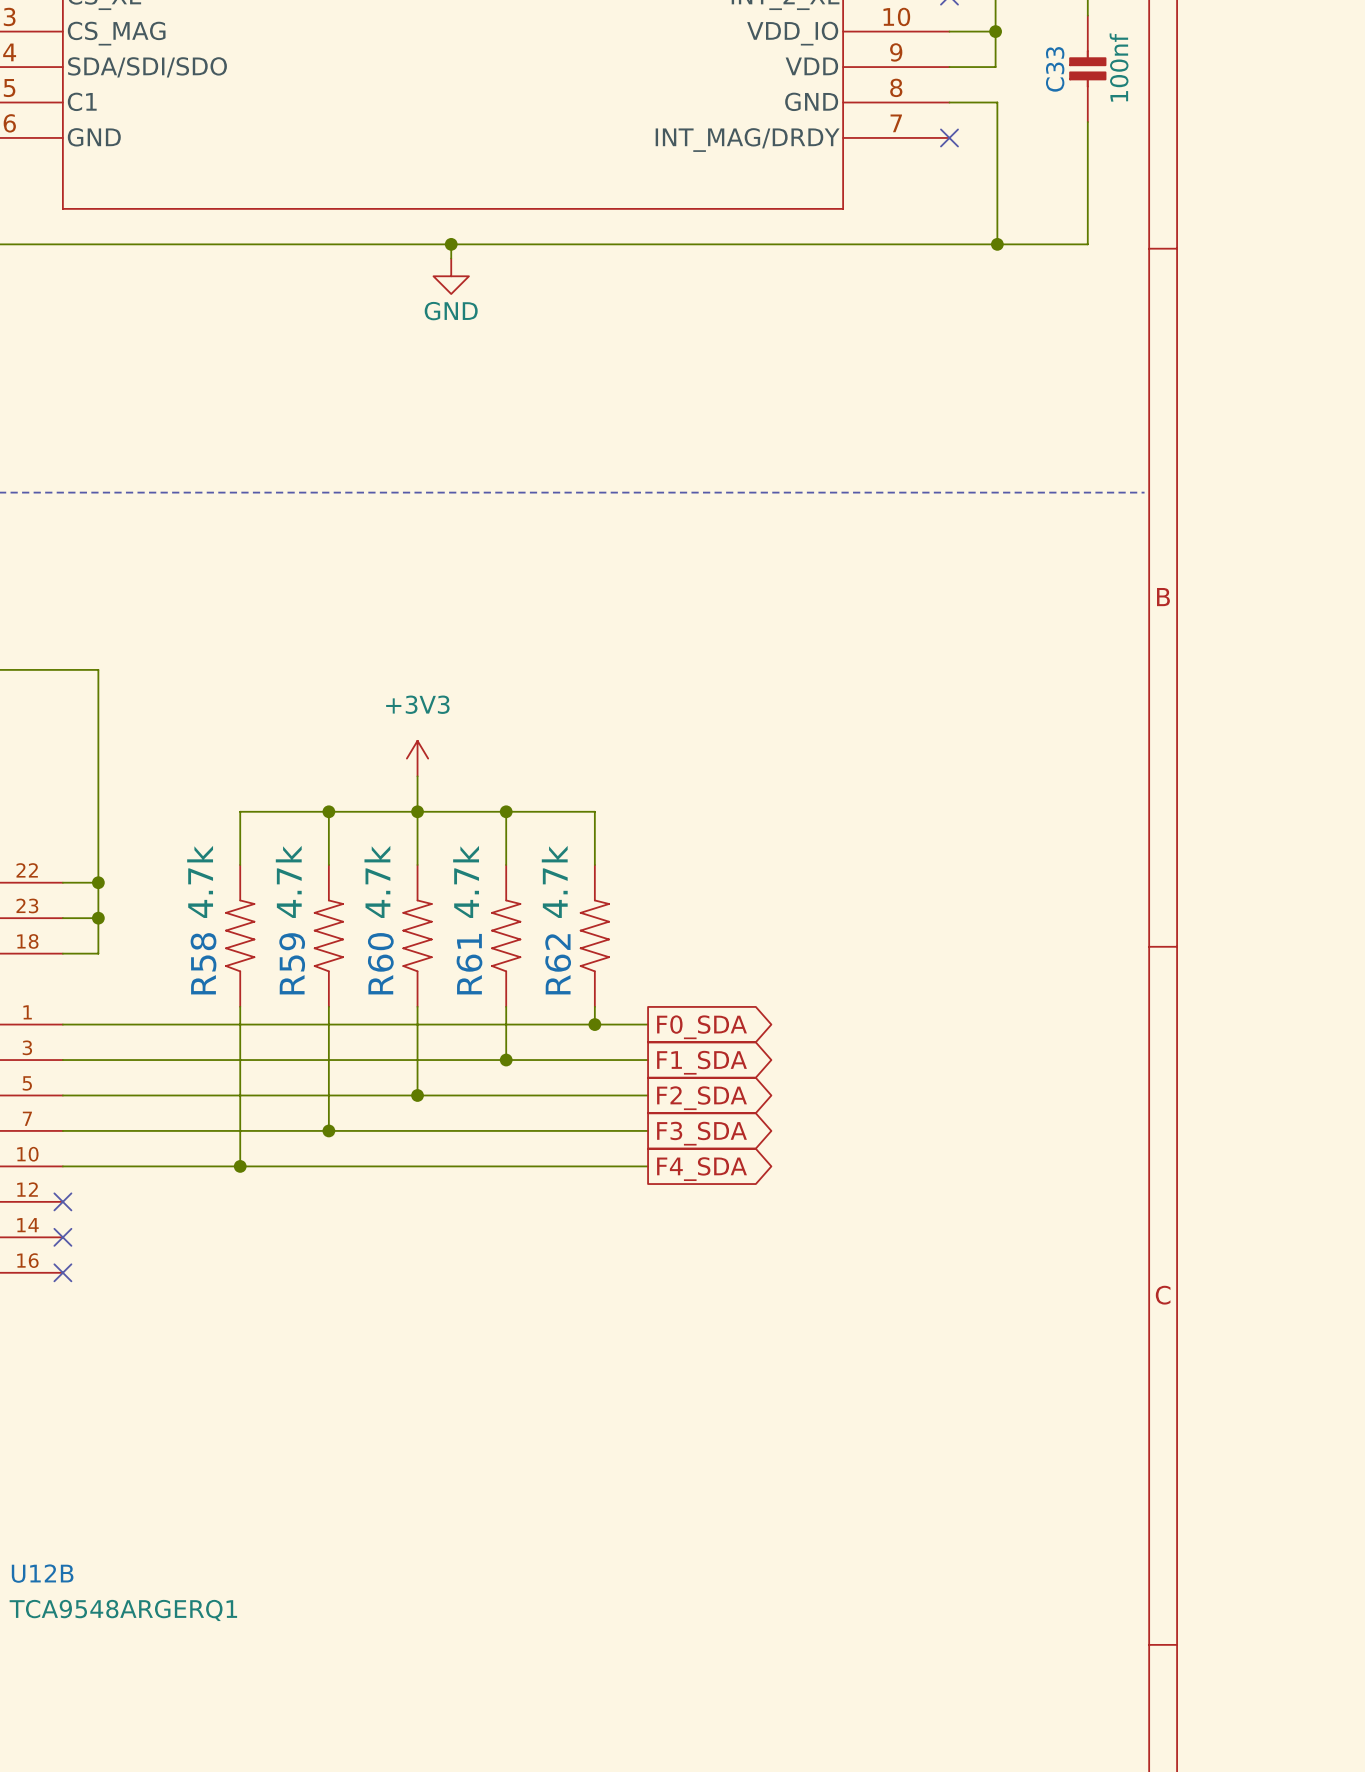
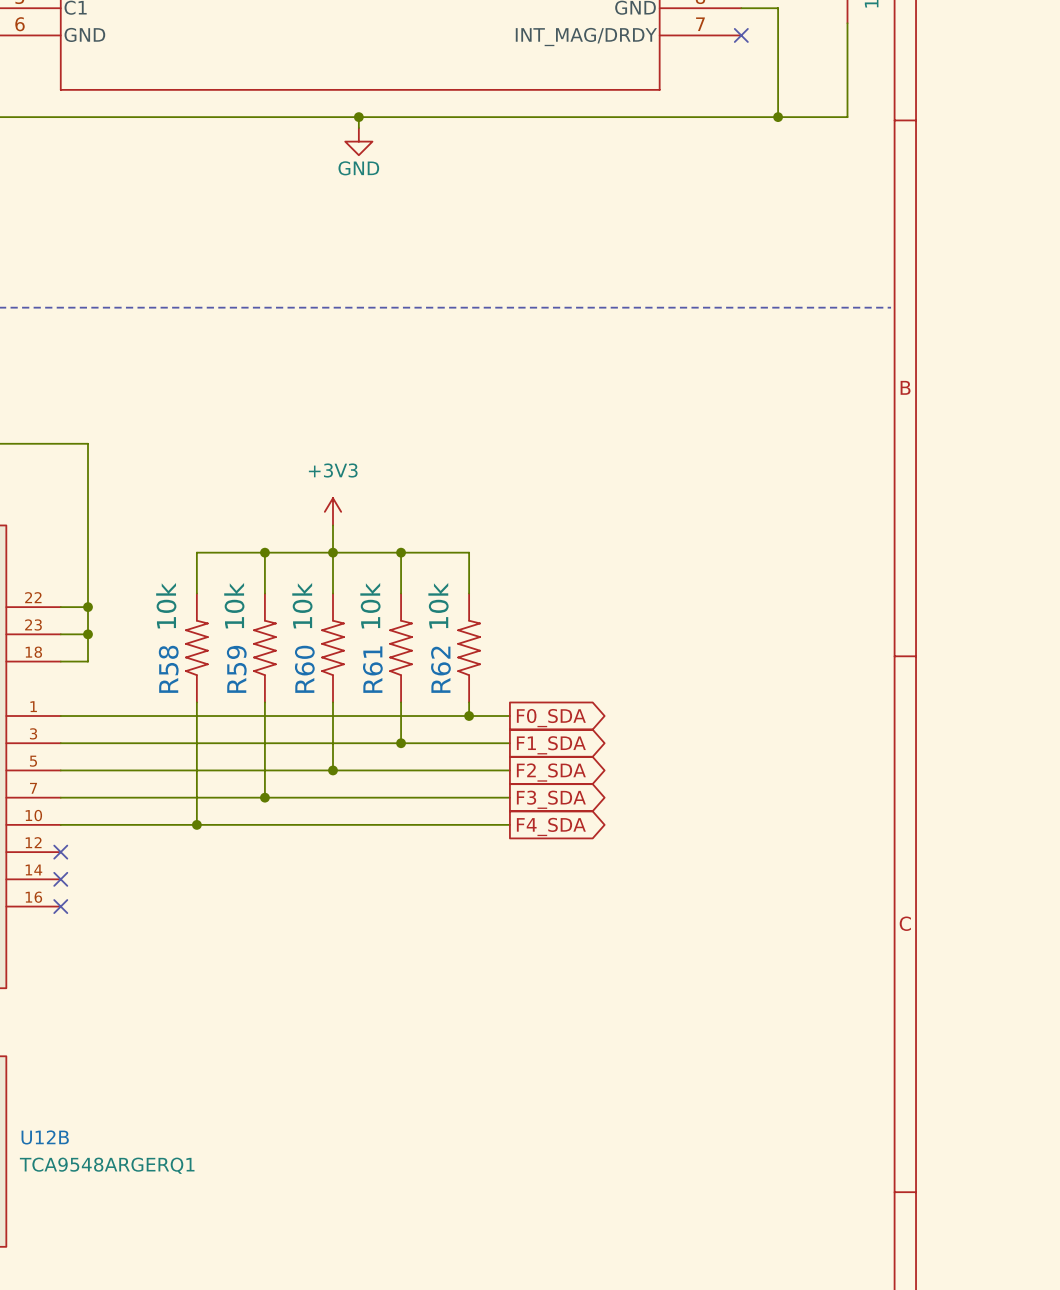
R58 value: 4.7k (200, 881) -> 10k (166, 605)
R59 value: 4.7k (288, 881) -> 10k (234, 605)
R60 value: 4.7k (377, 881) -> 10k (302, 605)
R61 value: 4.7k (466, 881) -> 10k (370, 605)
R62 value: 4.7k (554, 881) -> 10k (438, 605)

